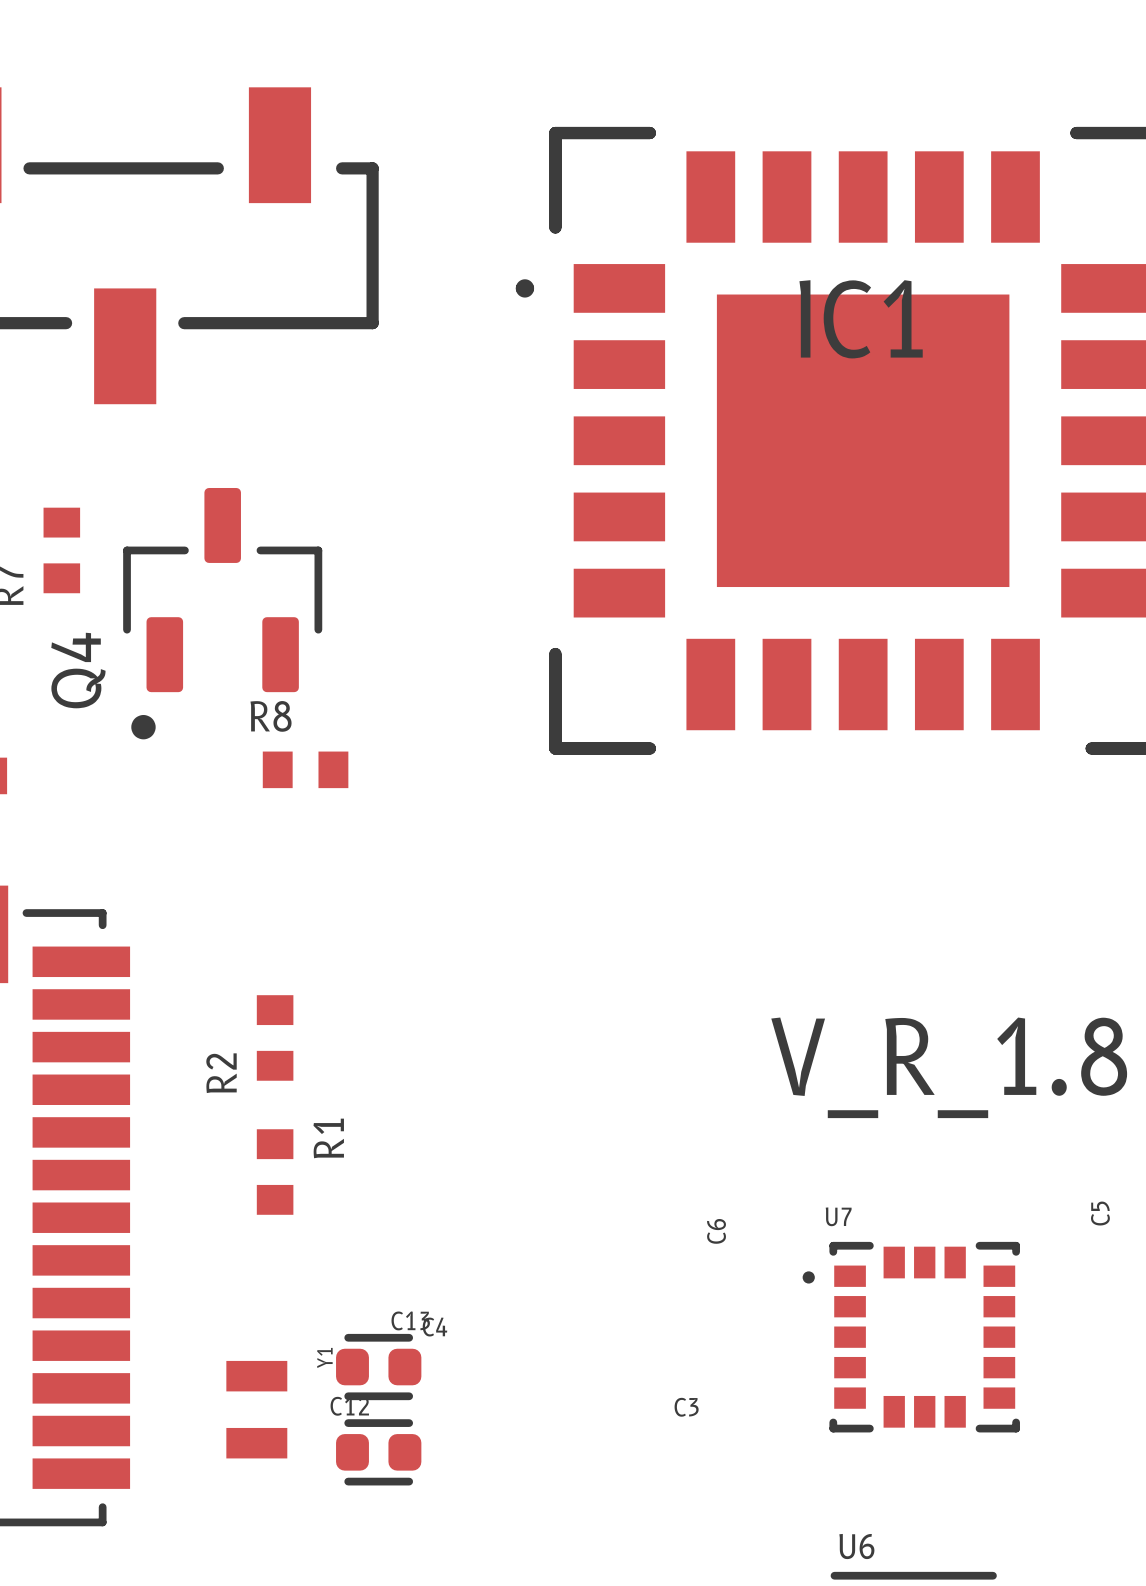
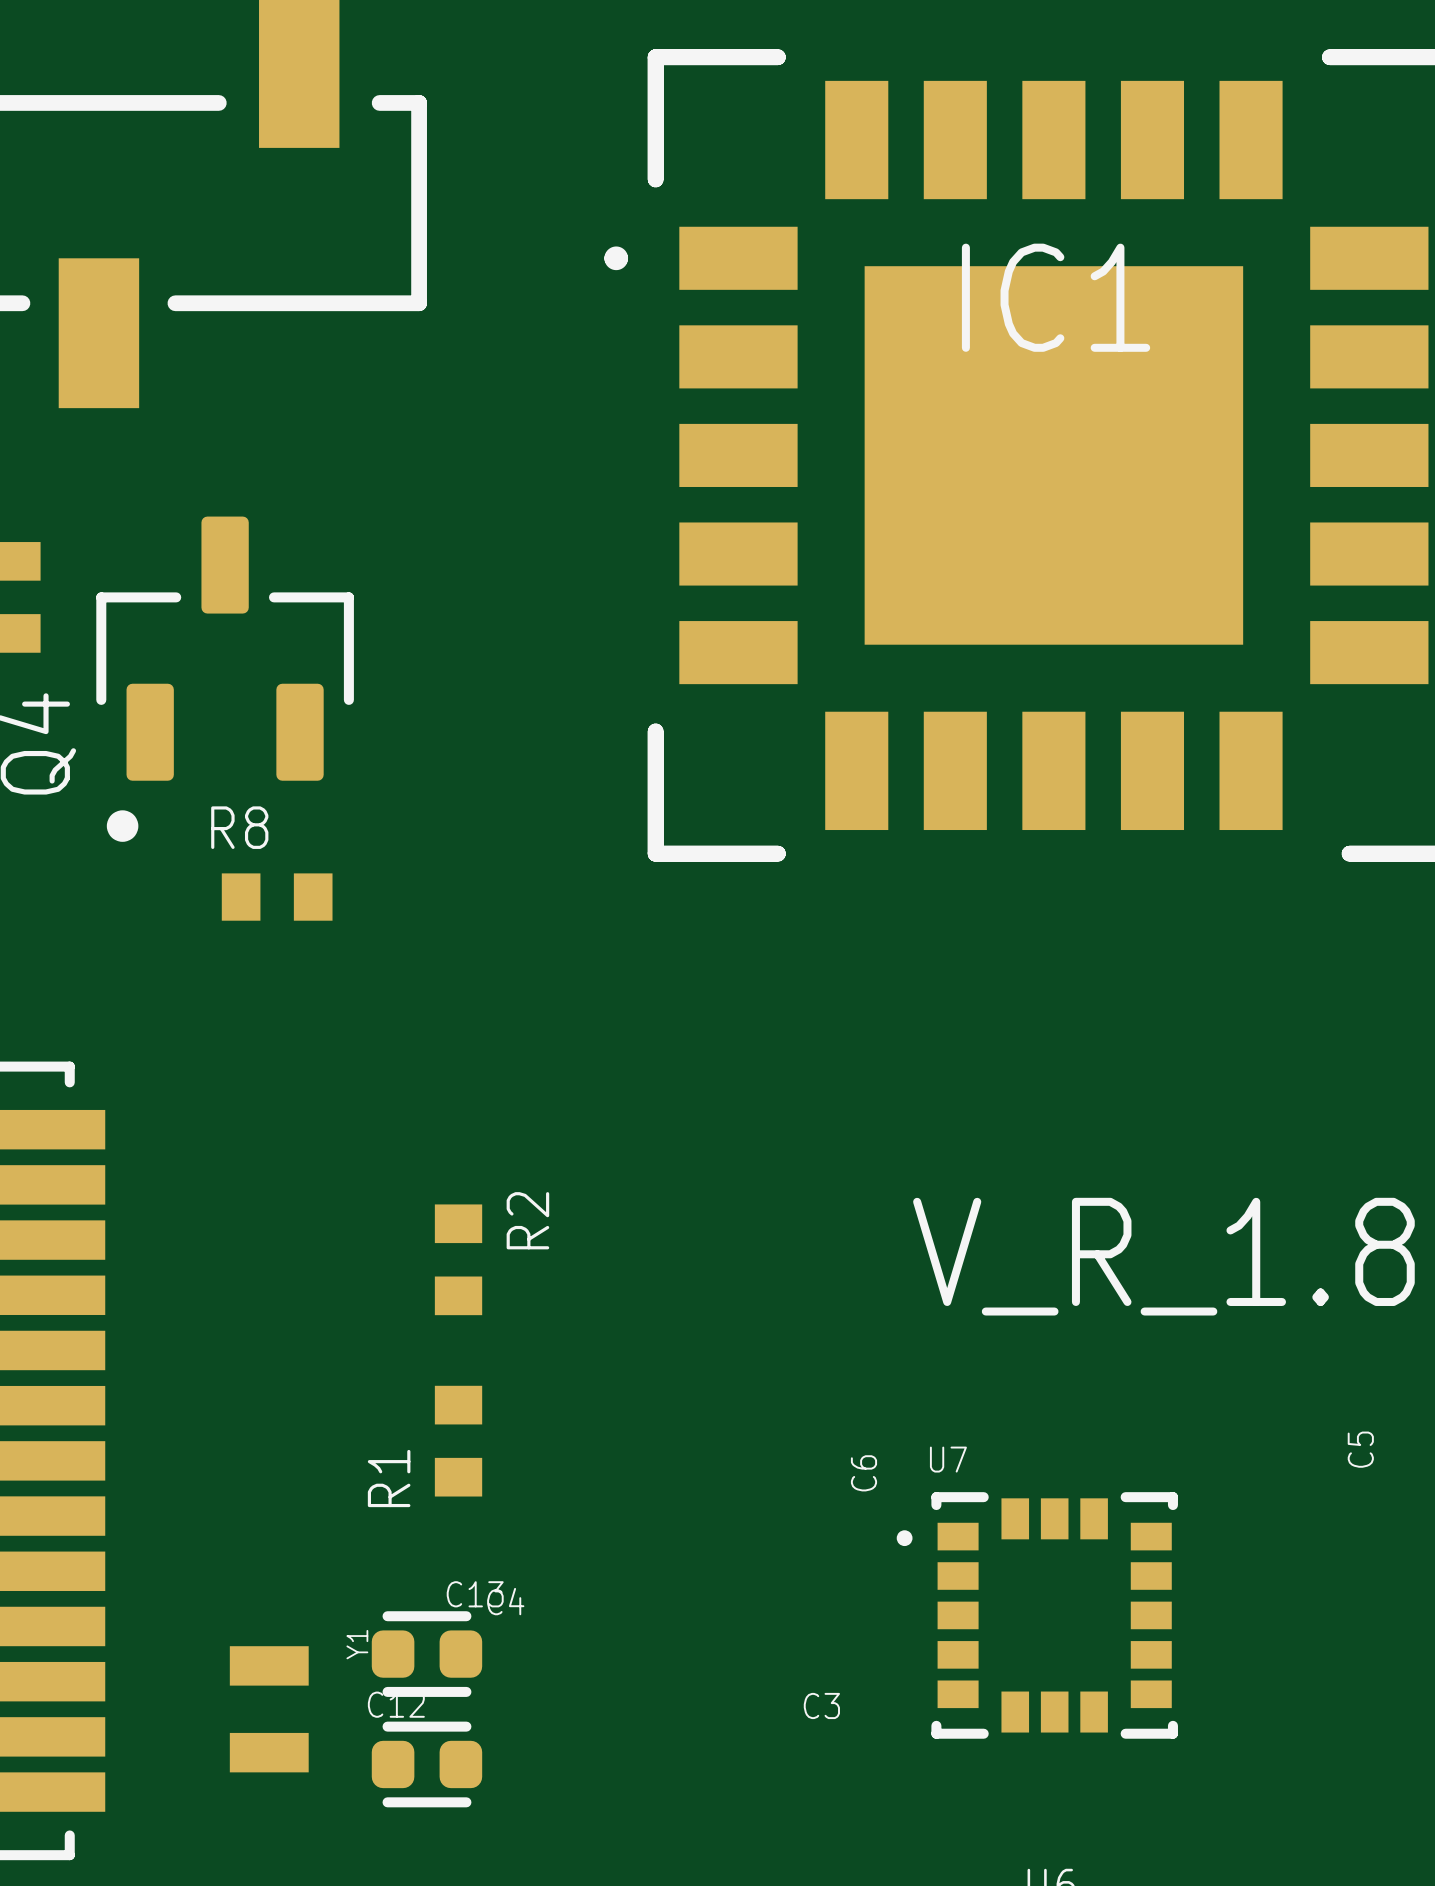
R8 position: (305, 769) -> (277, 897)
R2 position: (275, 1037) -> (458, 1259)
R2 name position: R2 (221, 1073) -> R2 (527, 1220)
R1 name position: R1 (328, 1138) -> R1 (389, 1478)
R1 position: (275, 1172) -> (458, 1441)
U7 position: (911, 1337) -> (1037, 1615)

